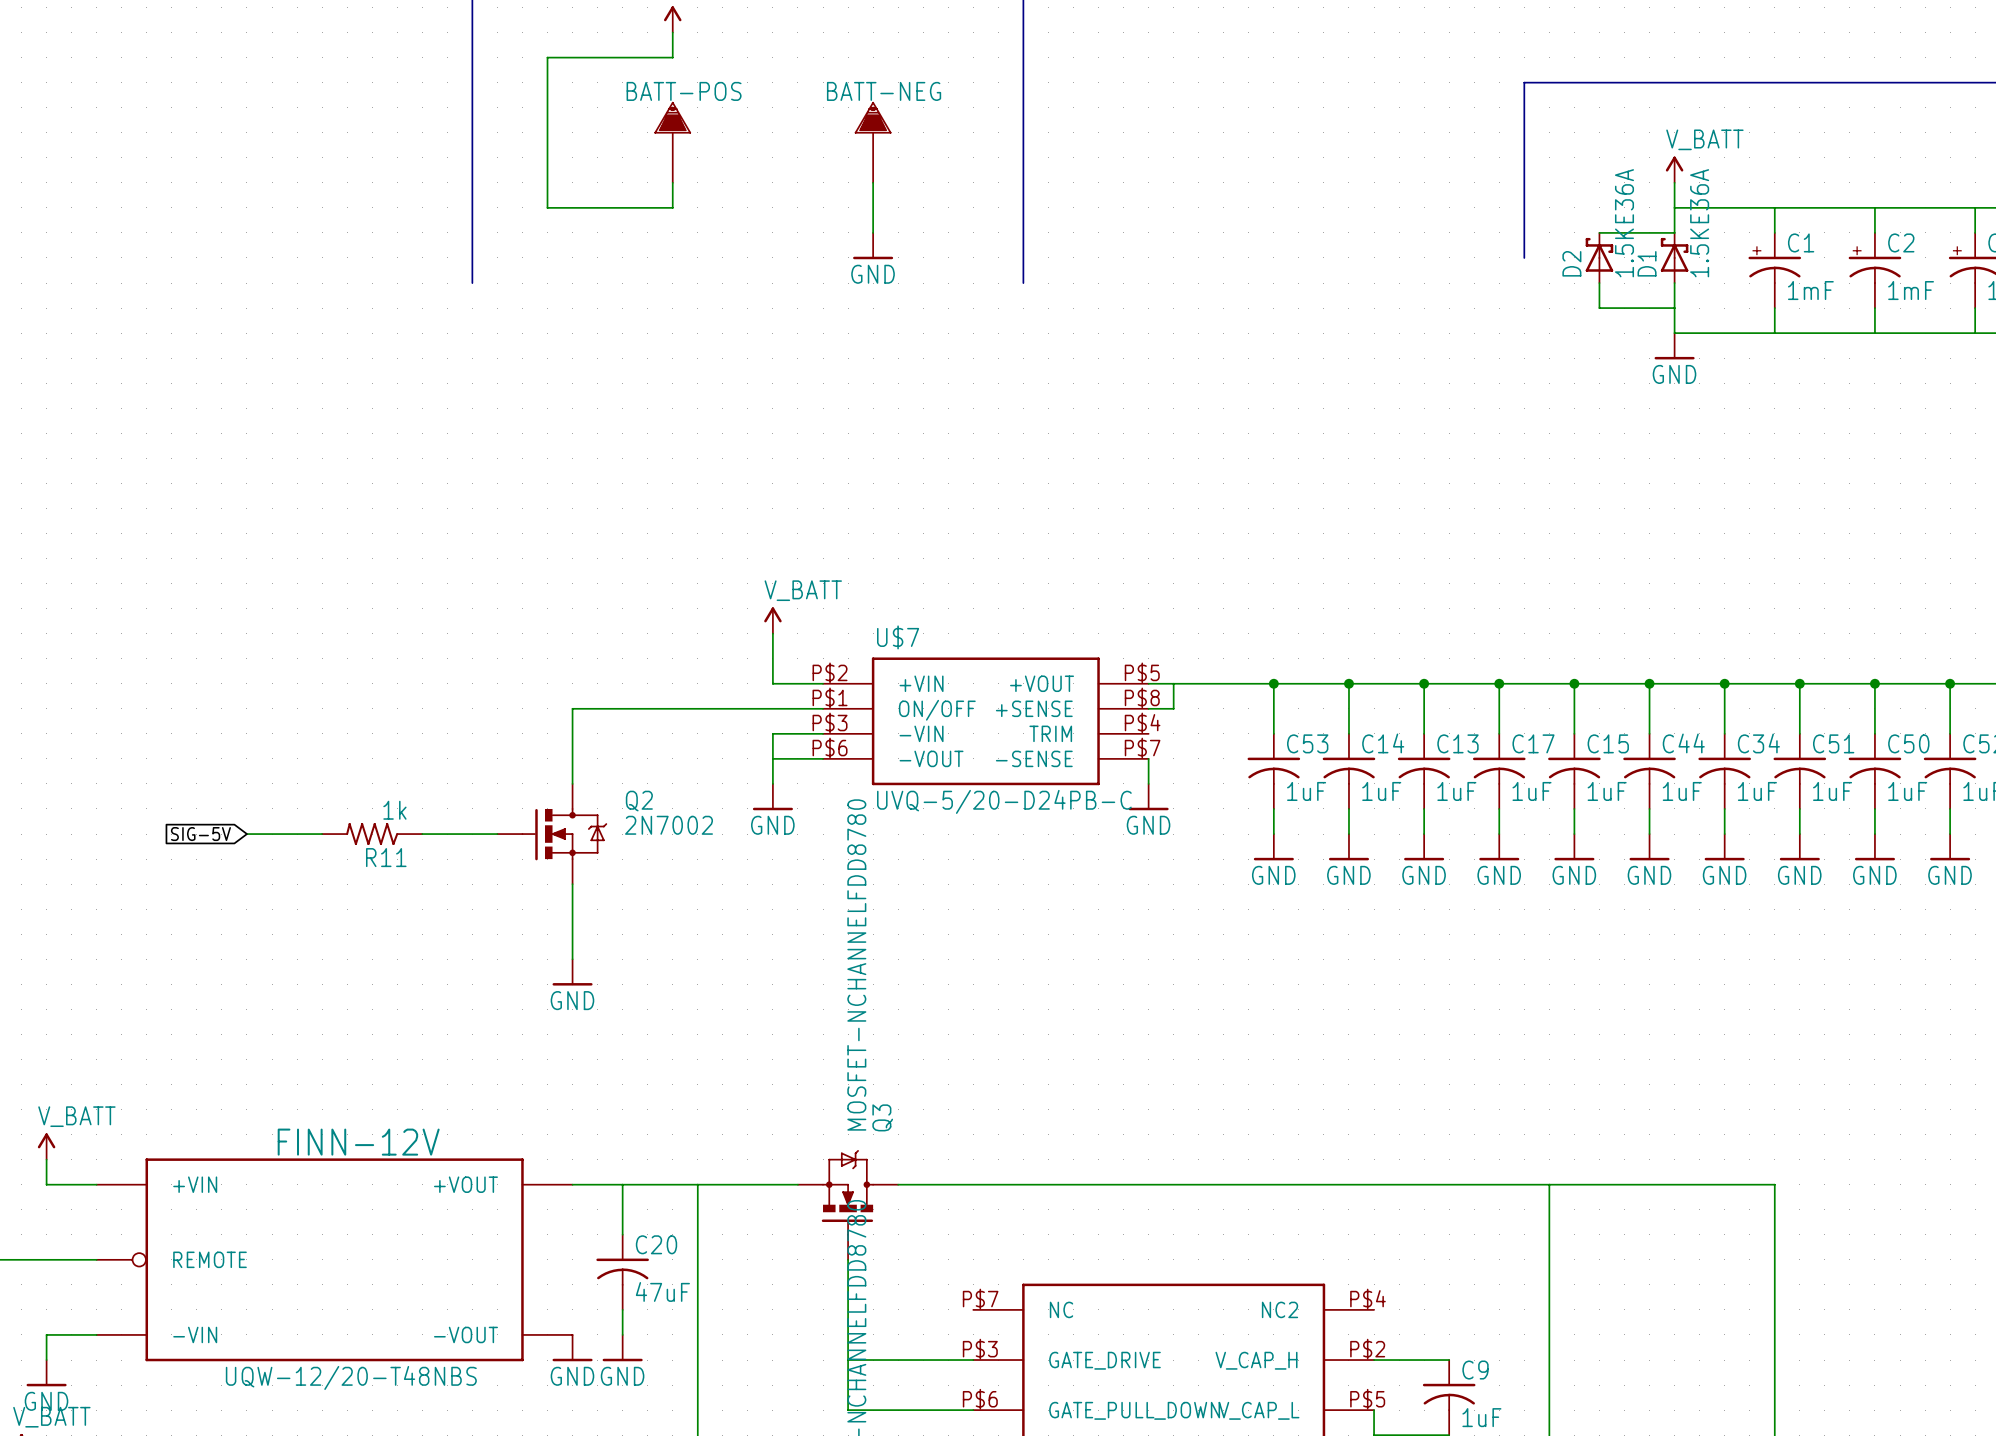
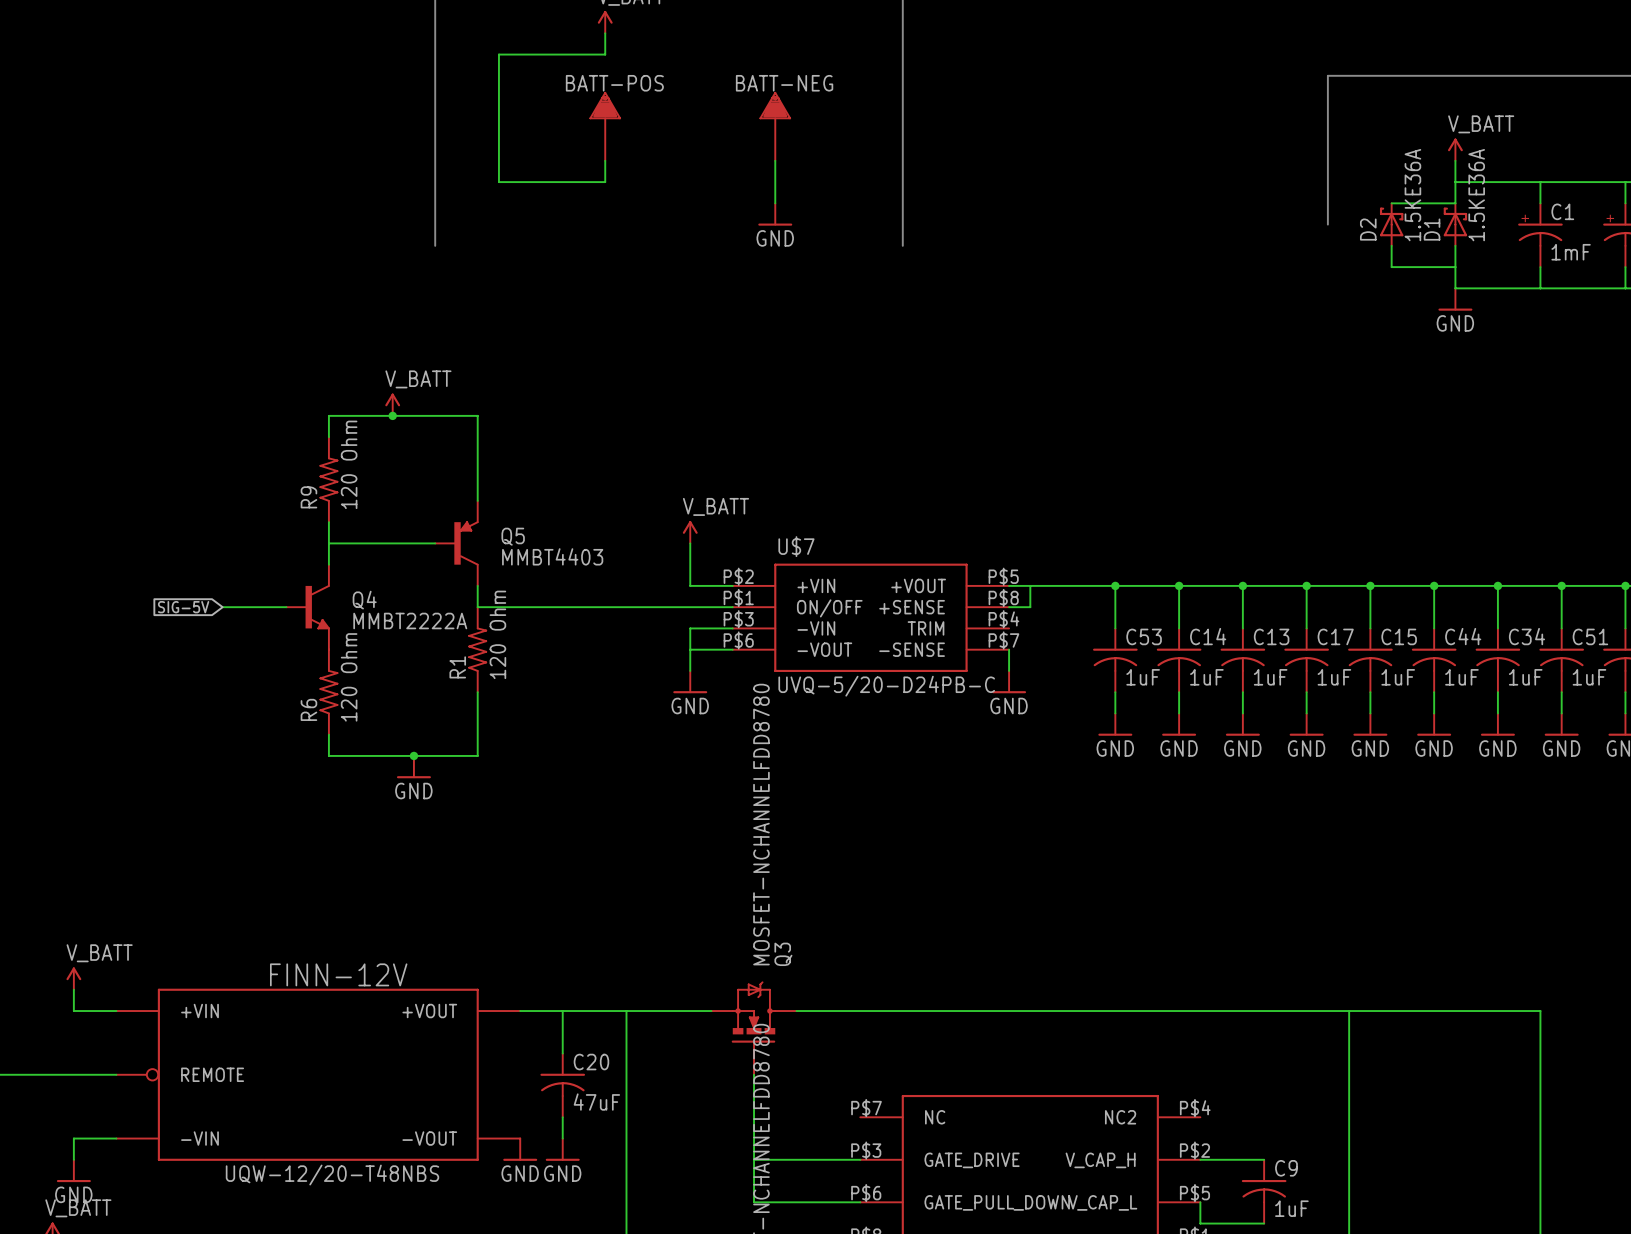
power symbol: none -> V_BATT (392, 404)
junction: none -> (392, 415)
wire: none -> (328, 437) (328, 415) (477, 415) (477, 500)
R9: none -> 120 Ohm (328, 479)
wire: none -> (328, 522) (328, 564)
wire: none -> (328, 543) (435, 543)
Q5: none -> MMBT4403 (456, 543)
Q4: none -> MMBT2222A (307, 607)
wire: (572, 708) (572, 783) -> (520, 607) (477, 607) (477, 585)
R1: none -> 120 Ohm (477, 649)
R6: none -> 120 Ohm (328, 692)
wire: none -> (477, 692) (477, 755) (328, 755) (328, 734)
global label position: SIG-5V (200, 834) -> SIG-5V (183, 607)
wire: (246, 834) (322, 834) -> (222, 607) (286, 607)
R11: 1k (372, 834) -> none
wire: (422, 834) (497, 834) -> none
Q2: 2N7002 (552, 834) -> none
junction: none -> (413, 755)
wire: (572, 884) (572, 959) -> none
power symbol position: GND (572, 972) -> GND (413, 767)

